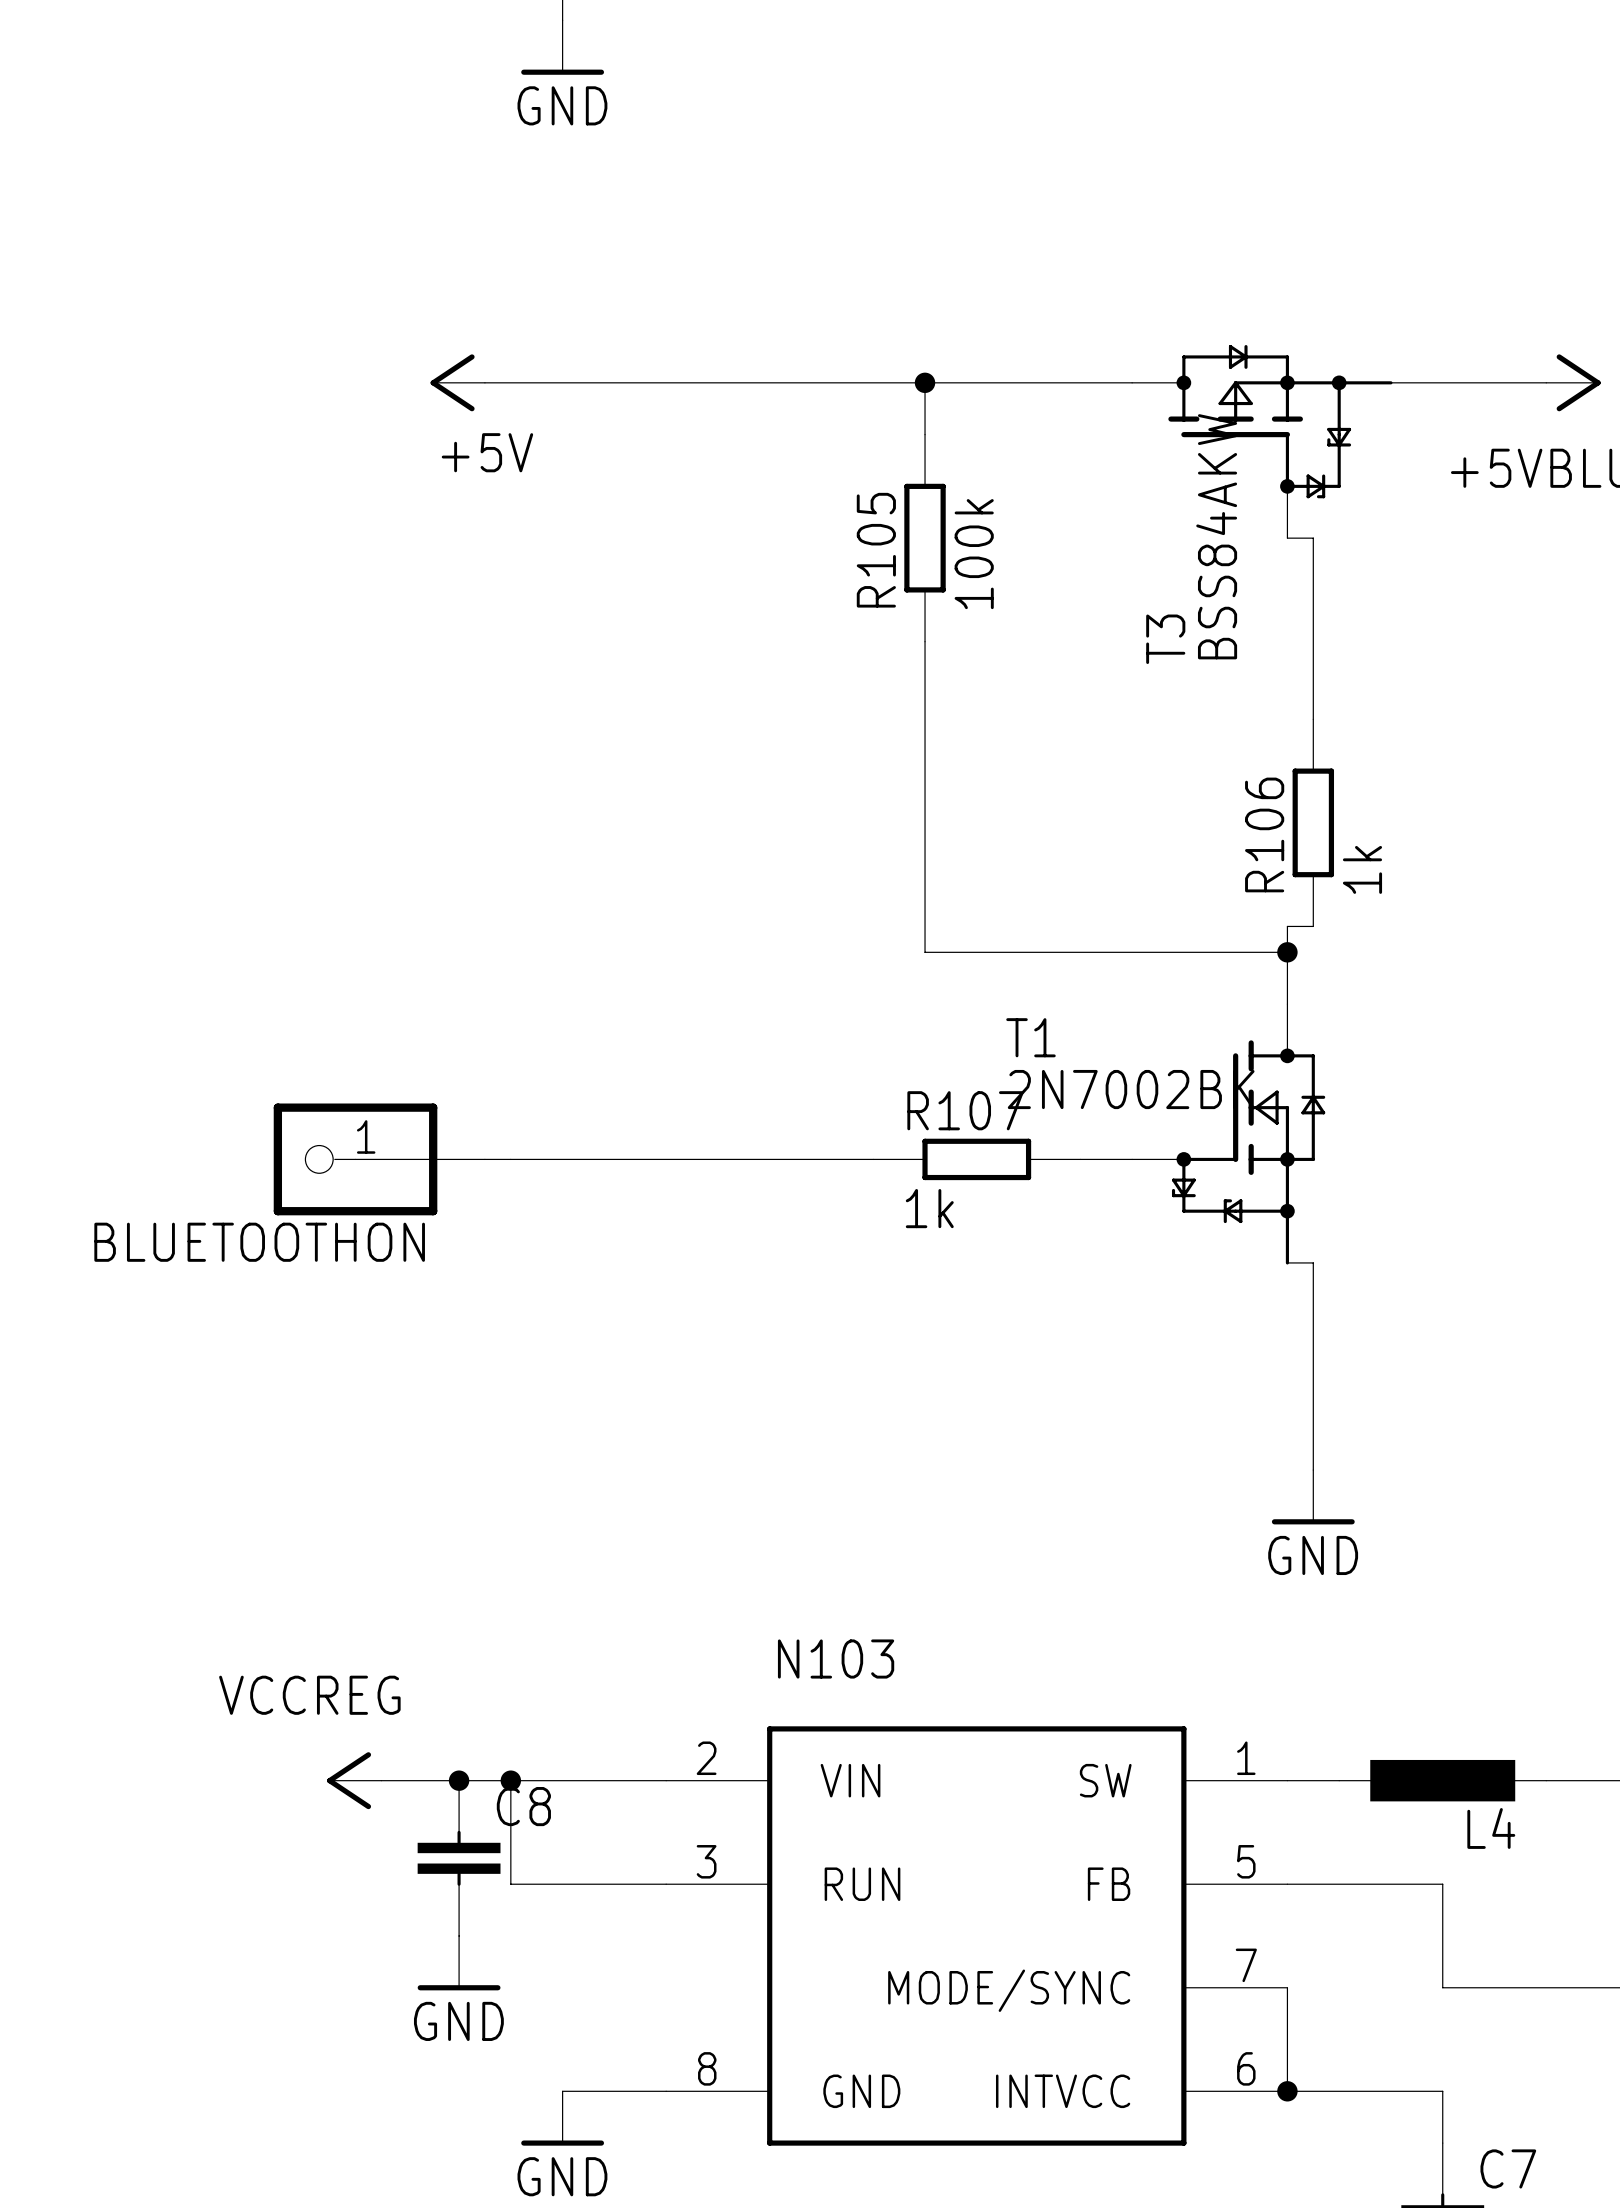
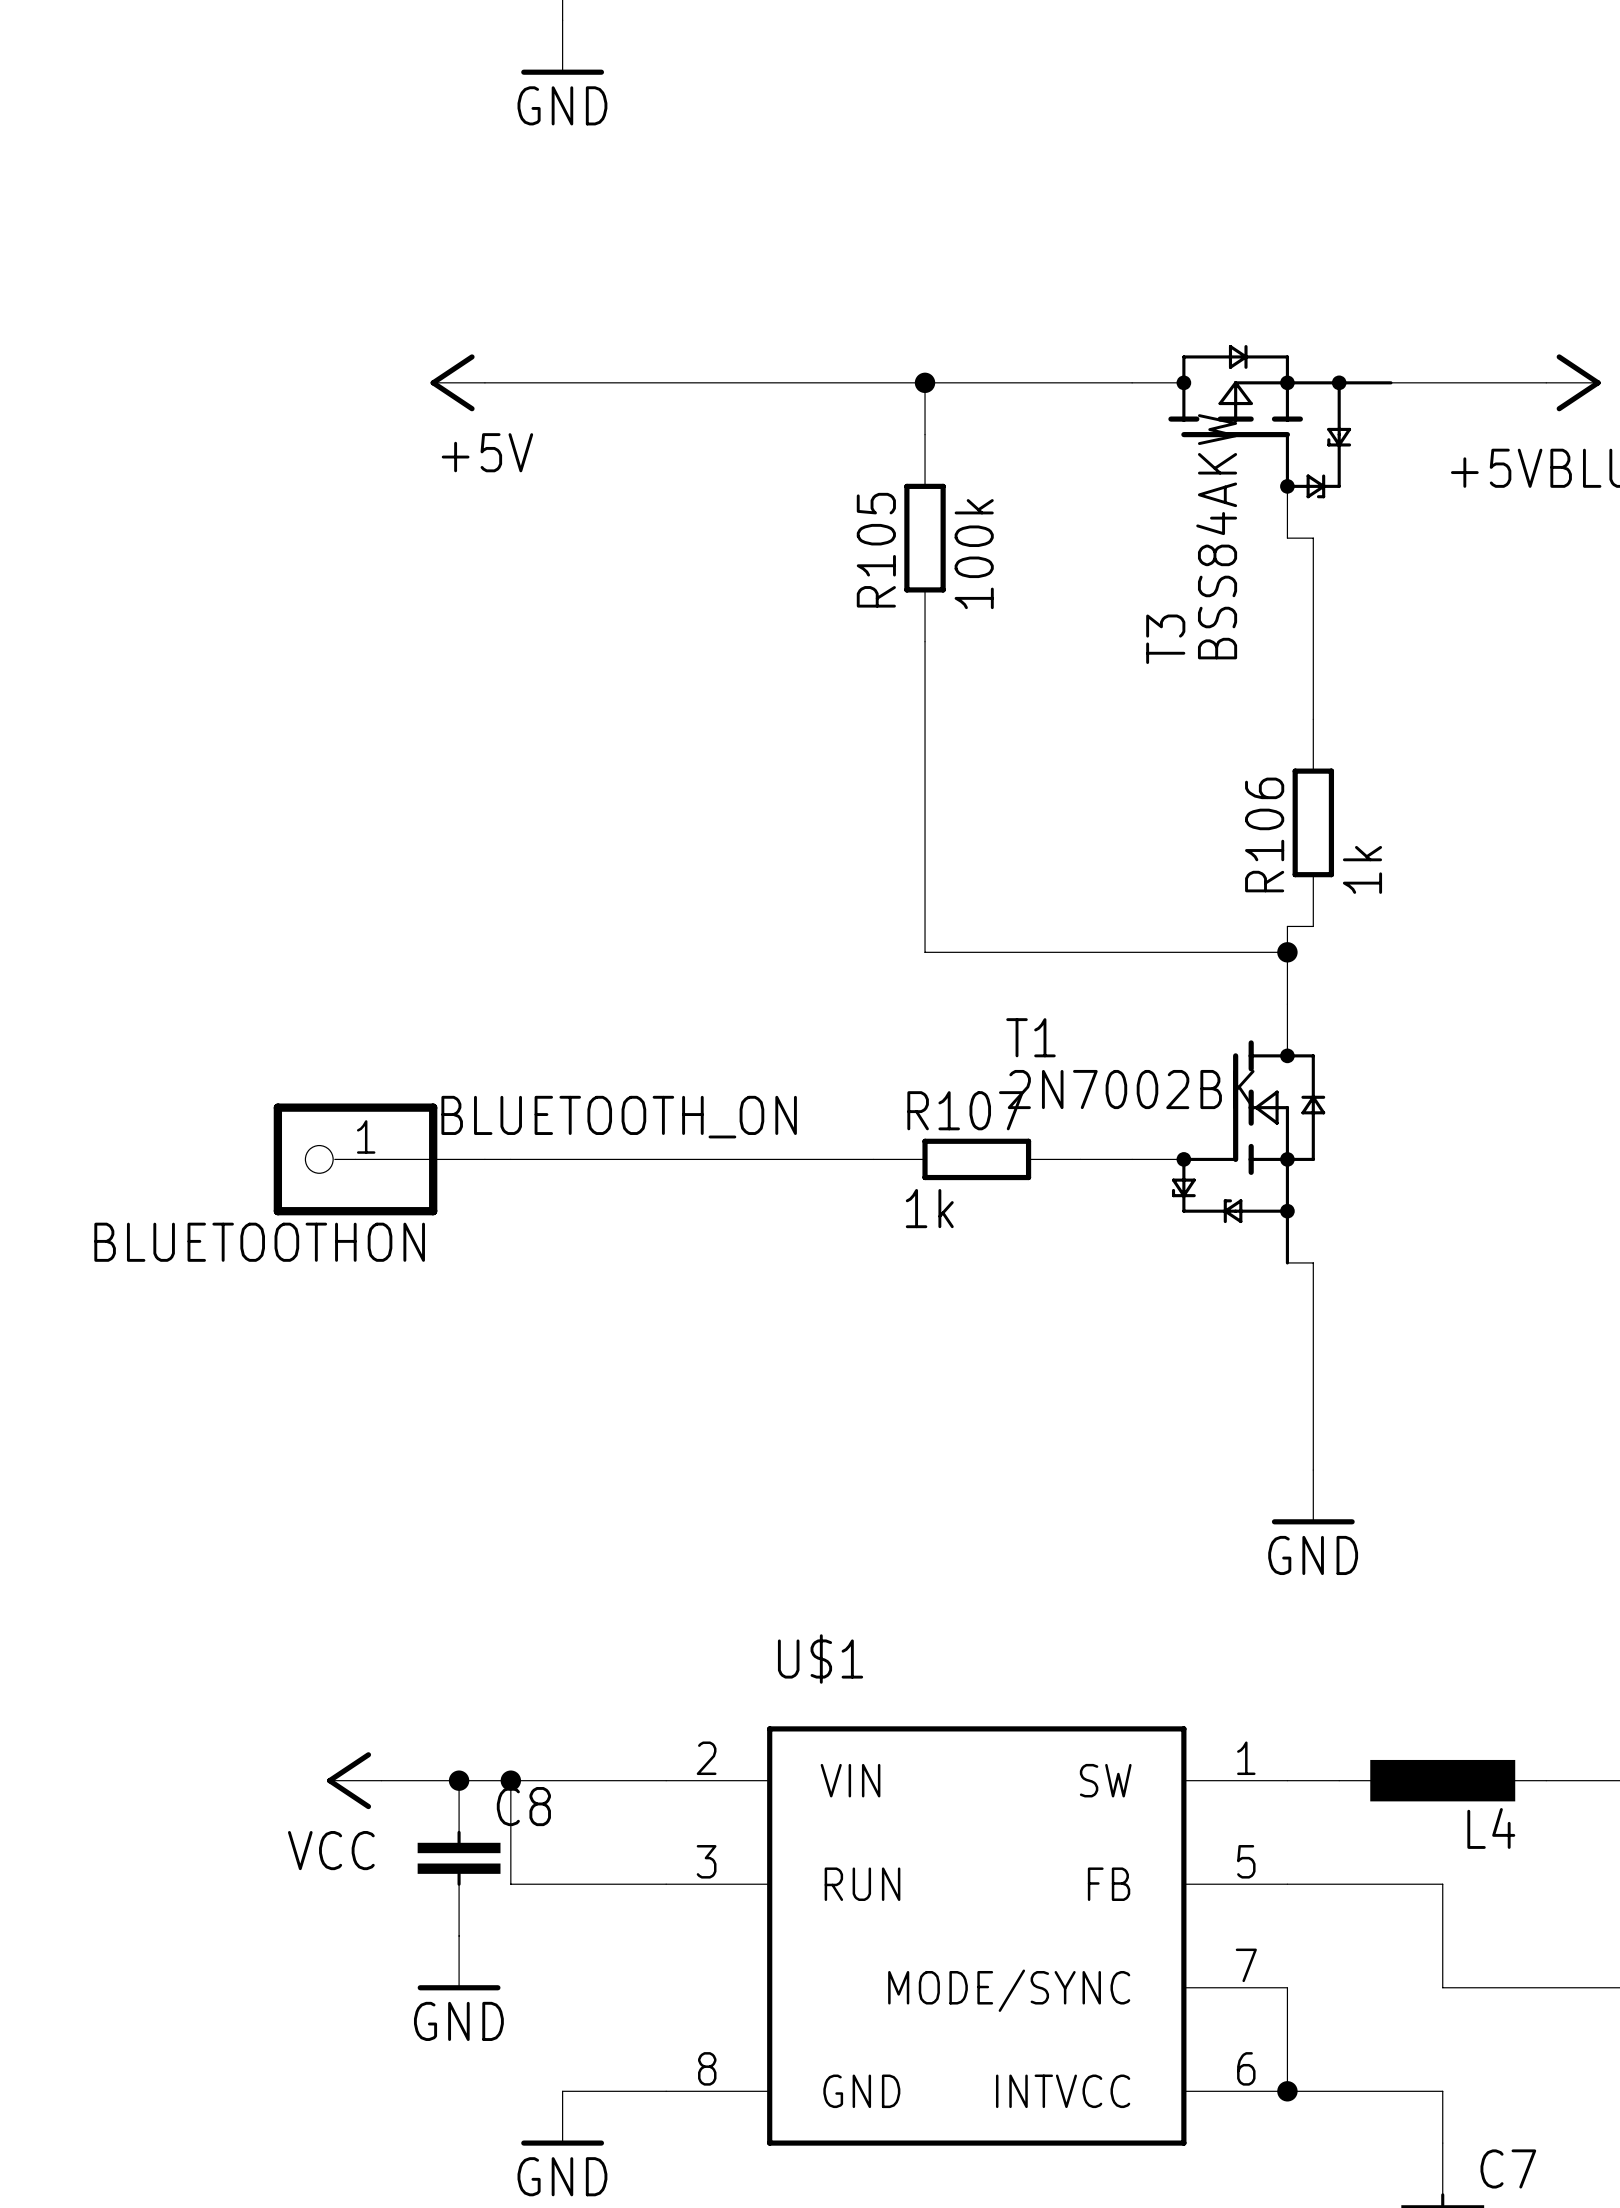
label: none -> BLUETOOTH_ON (619, 1117)
N103 name: N103 (836, 1659) -> U$1 (820, 1659)
label: VCCREG (309, 1695) -> none
power symbol text: none -> VCC (331, 1850)

